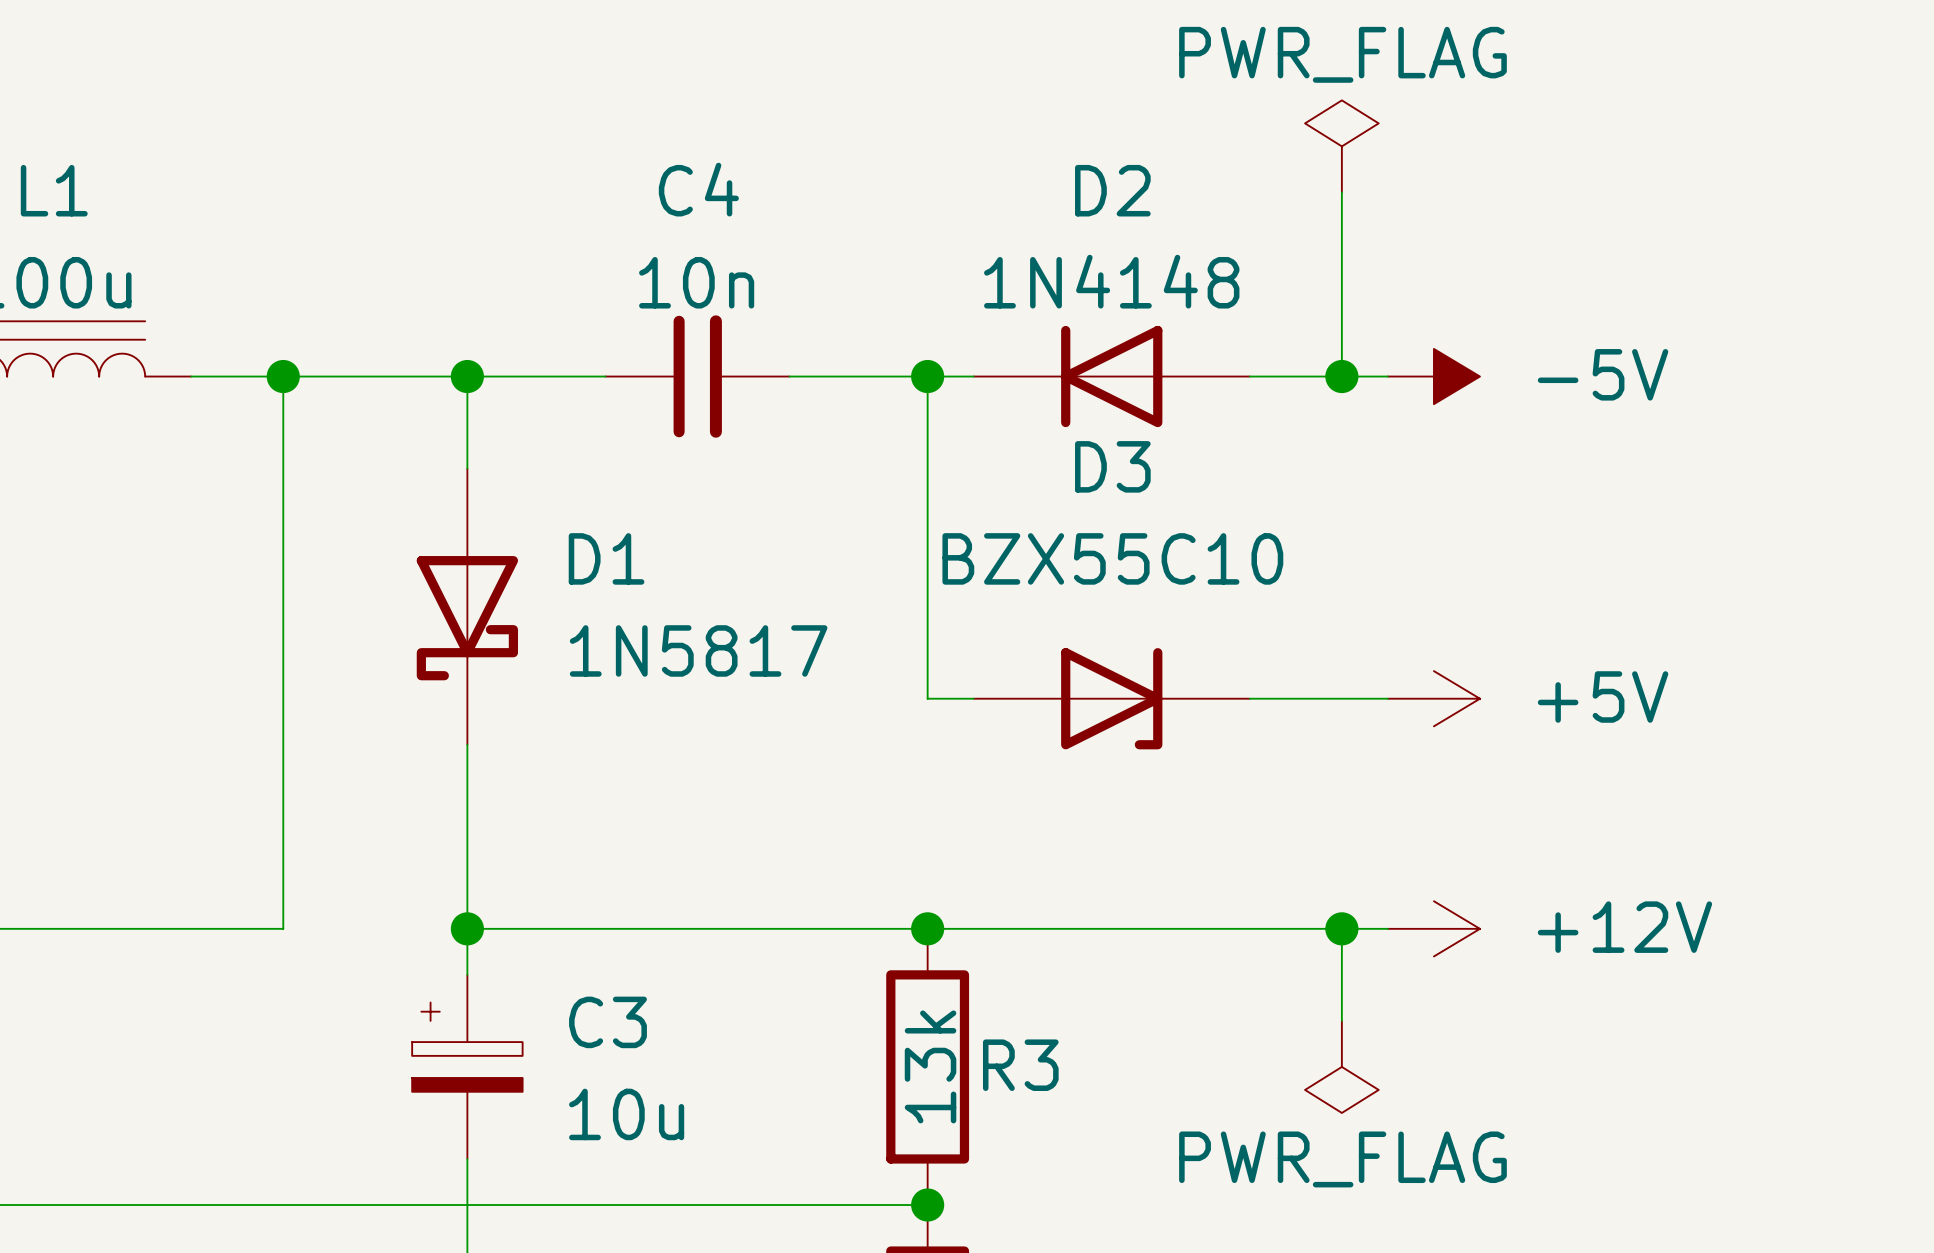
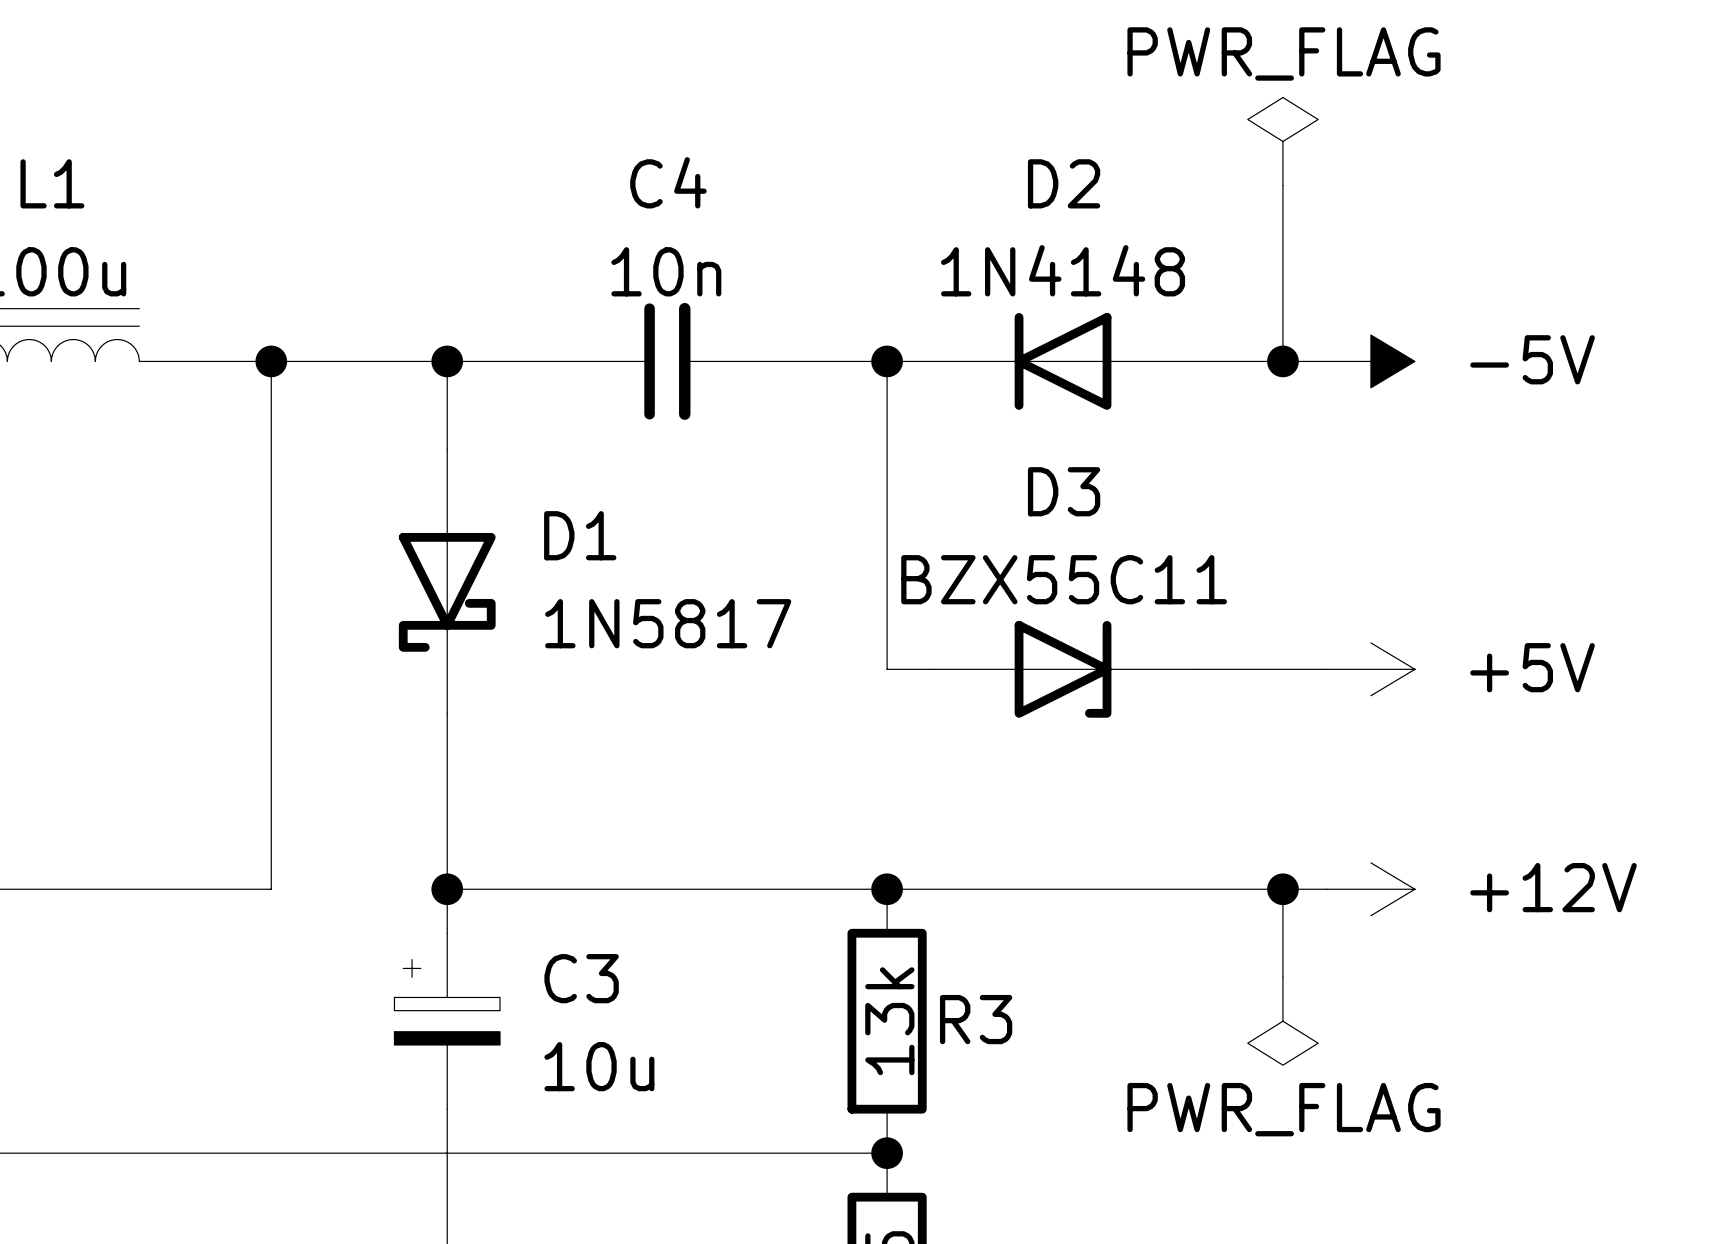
D3 name position: D3 (1112, 466) -> D3 (1064, 491)
D3 value: BZX55C10 (1112, 558) -> BZX55C11 (1064, 579)

